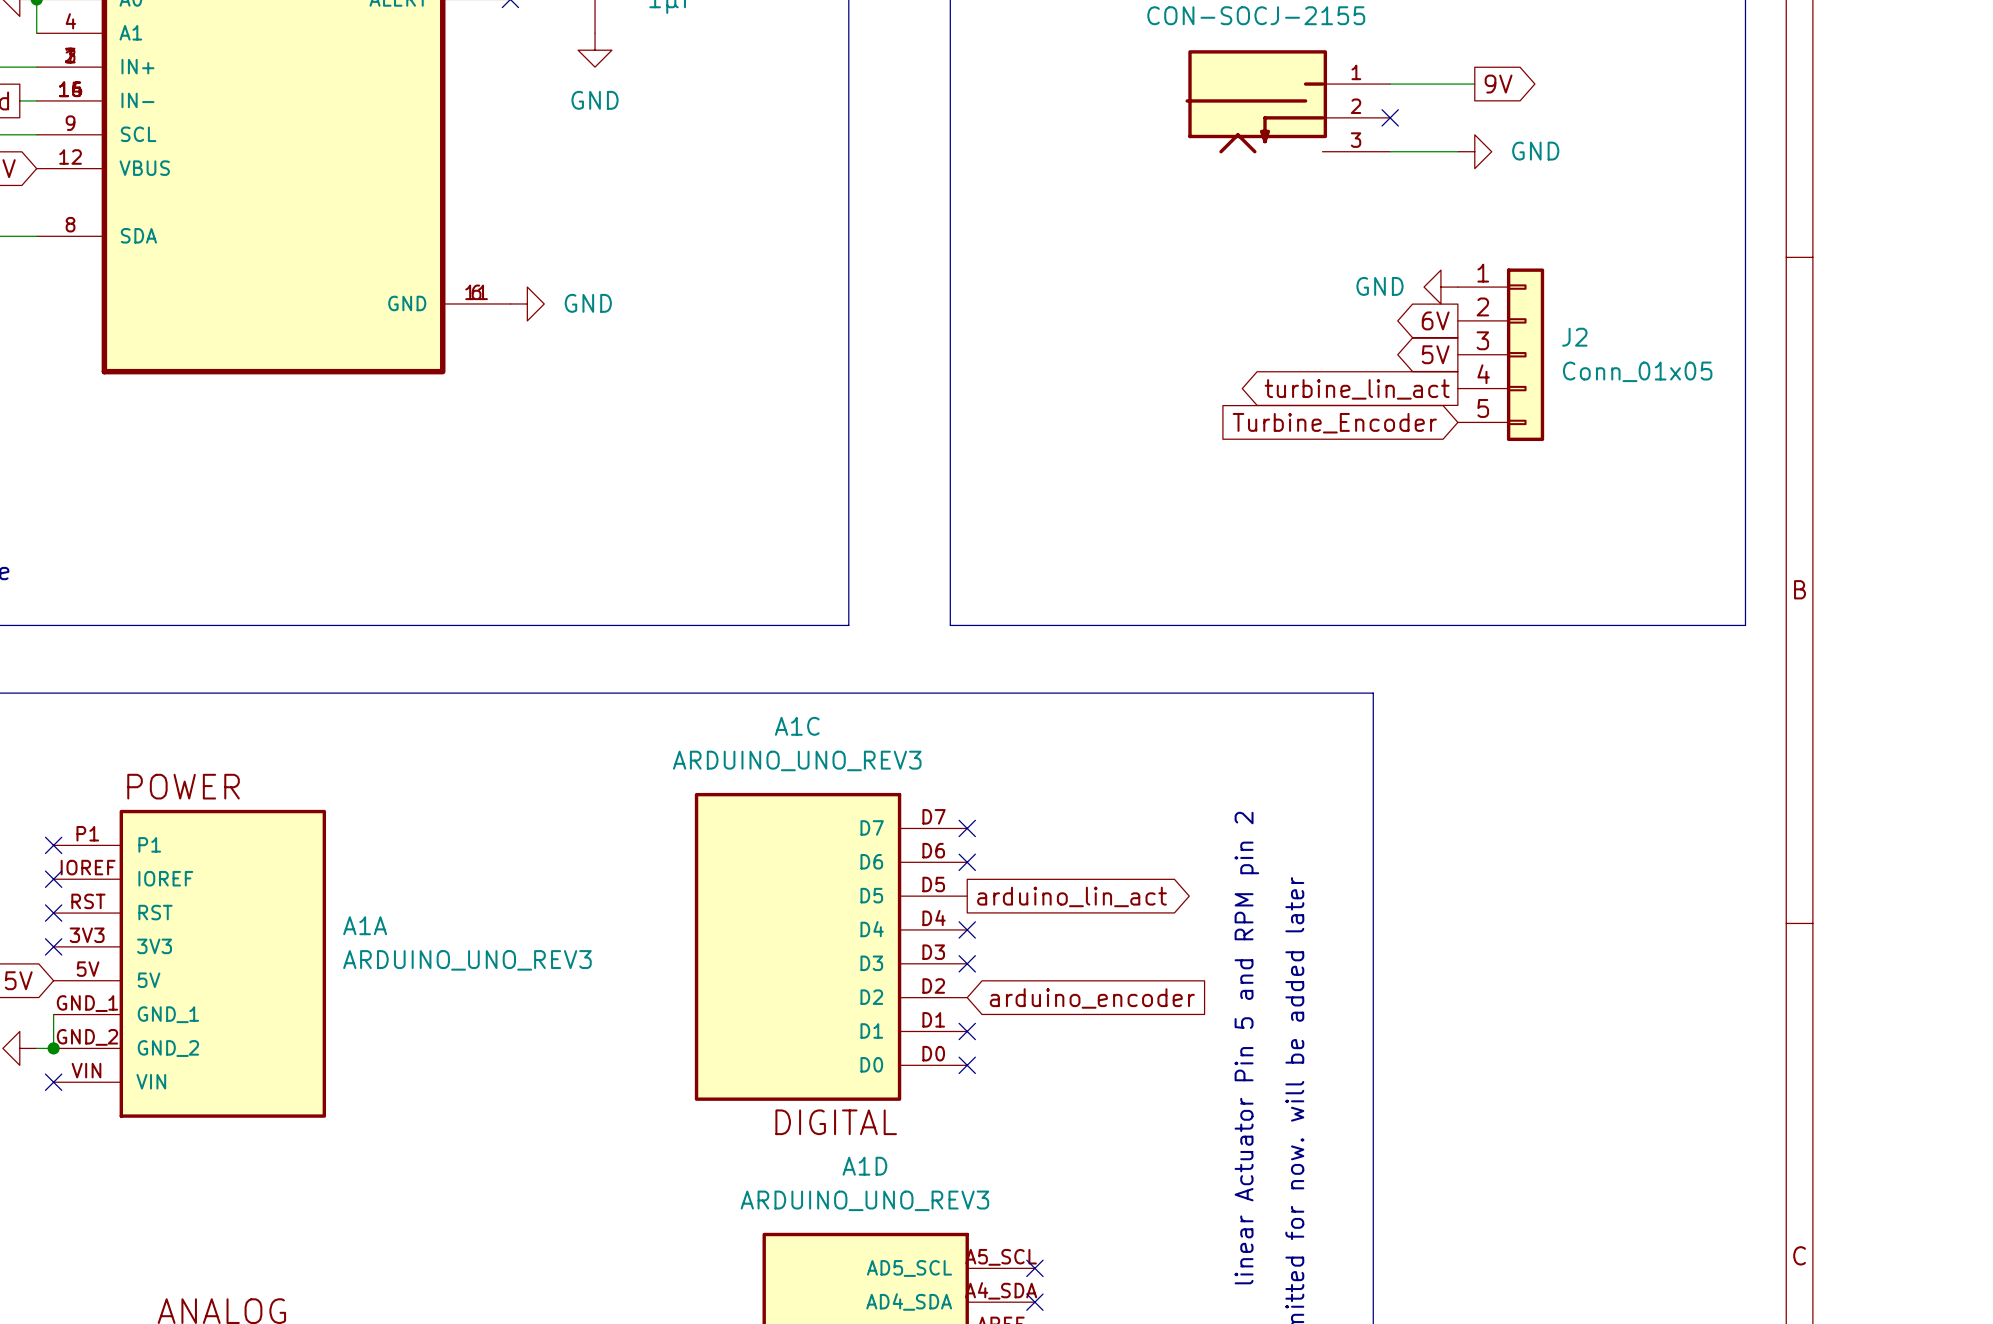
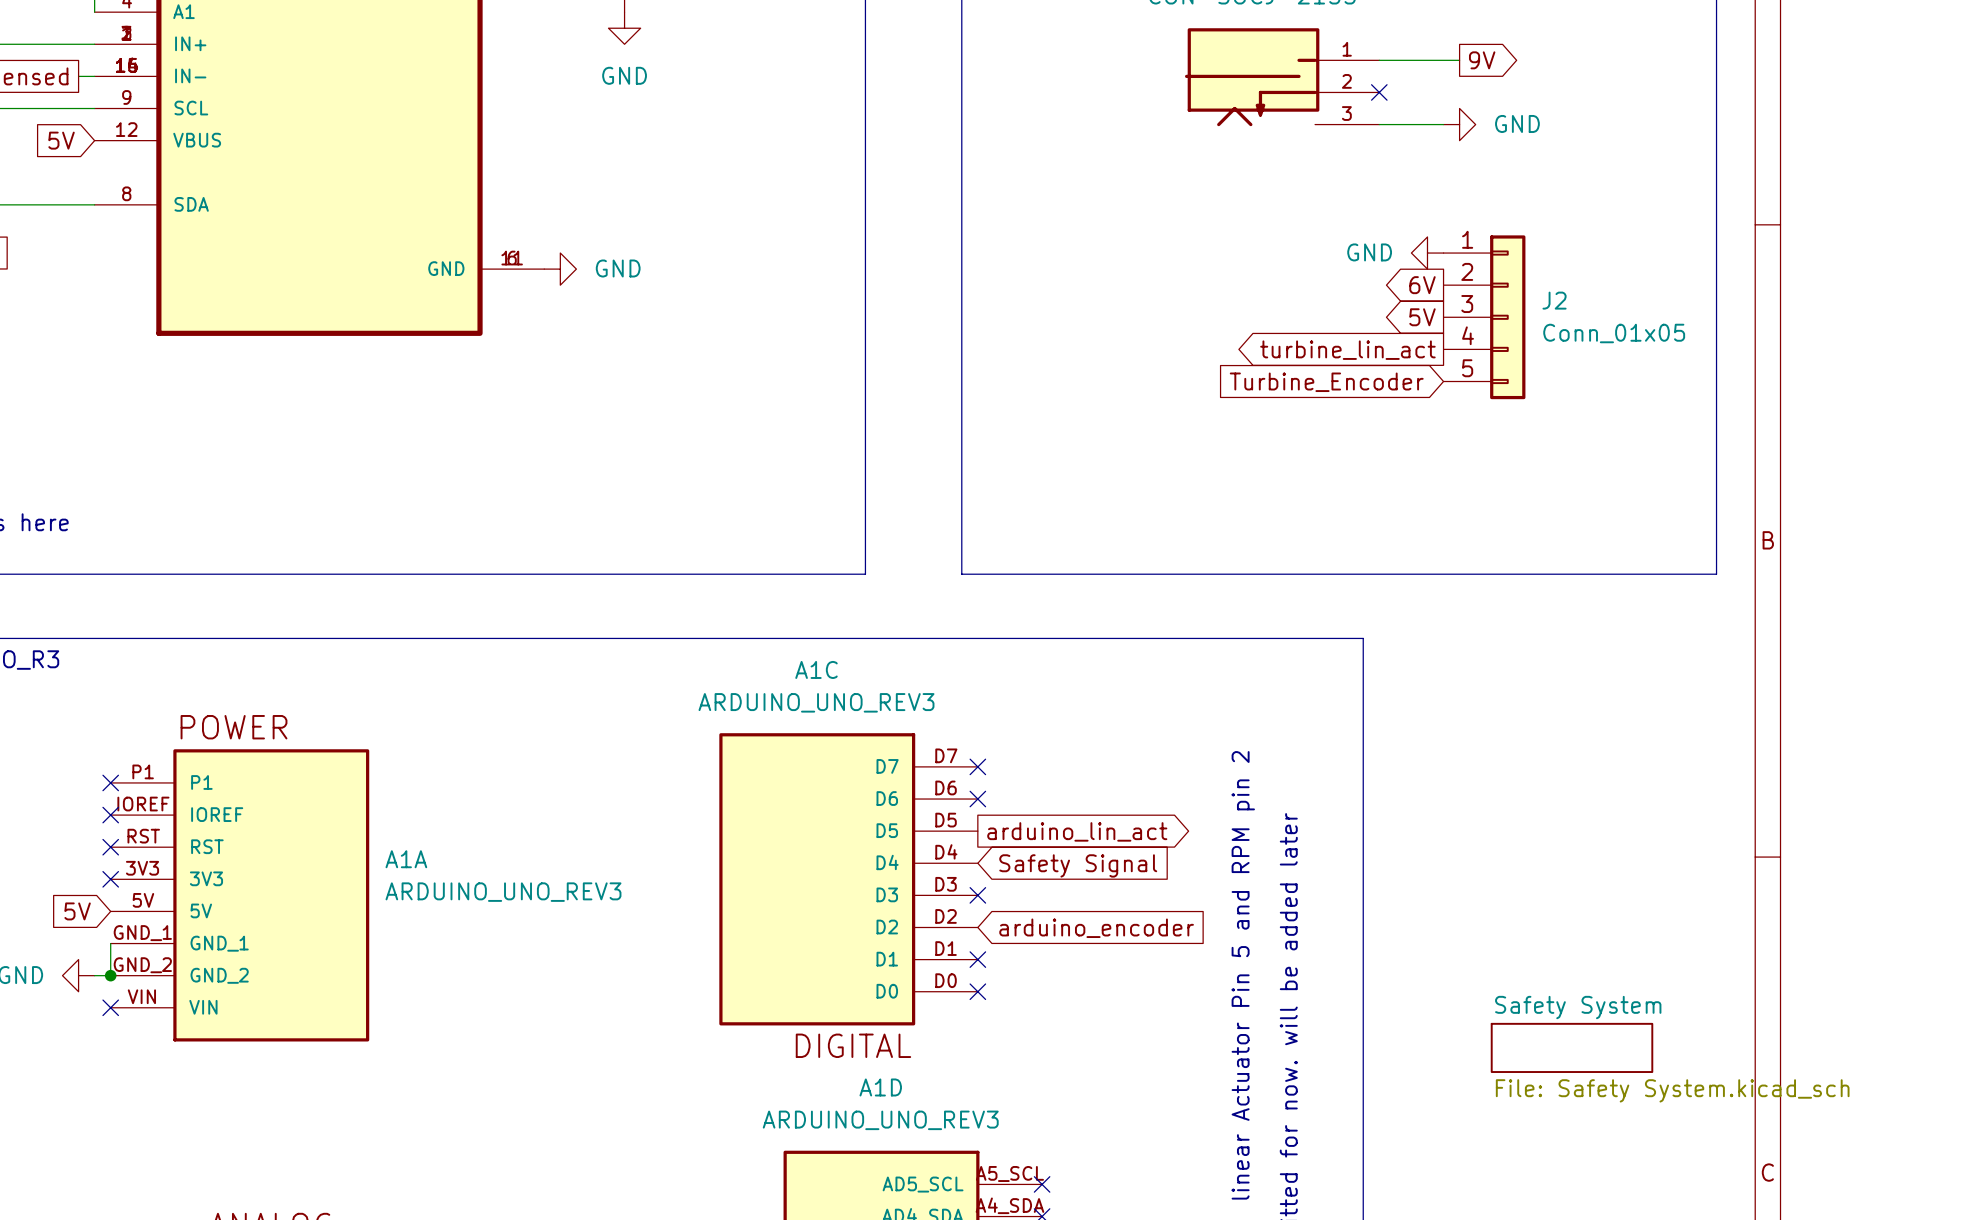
no-connect mark: (967, 929) -> none
global label: none -> Safety Signal (1078, 865)
sheet Safety System: none -> File: Safety System.kicad_sch (1572, 1047)

